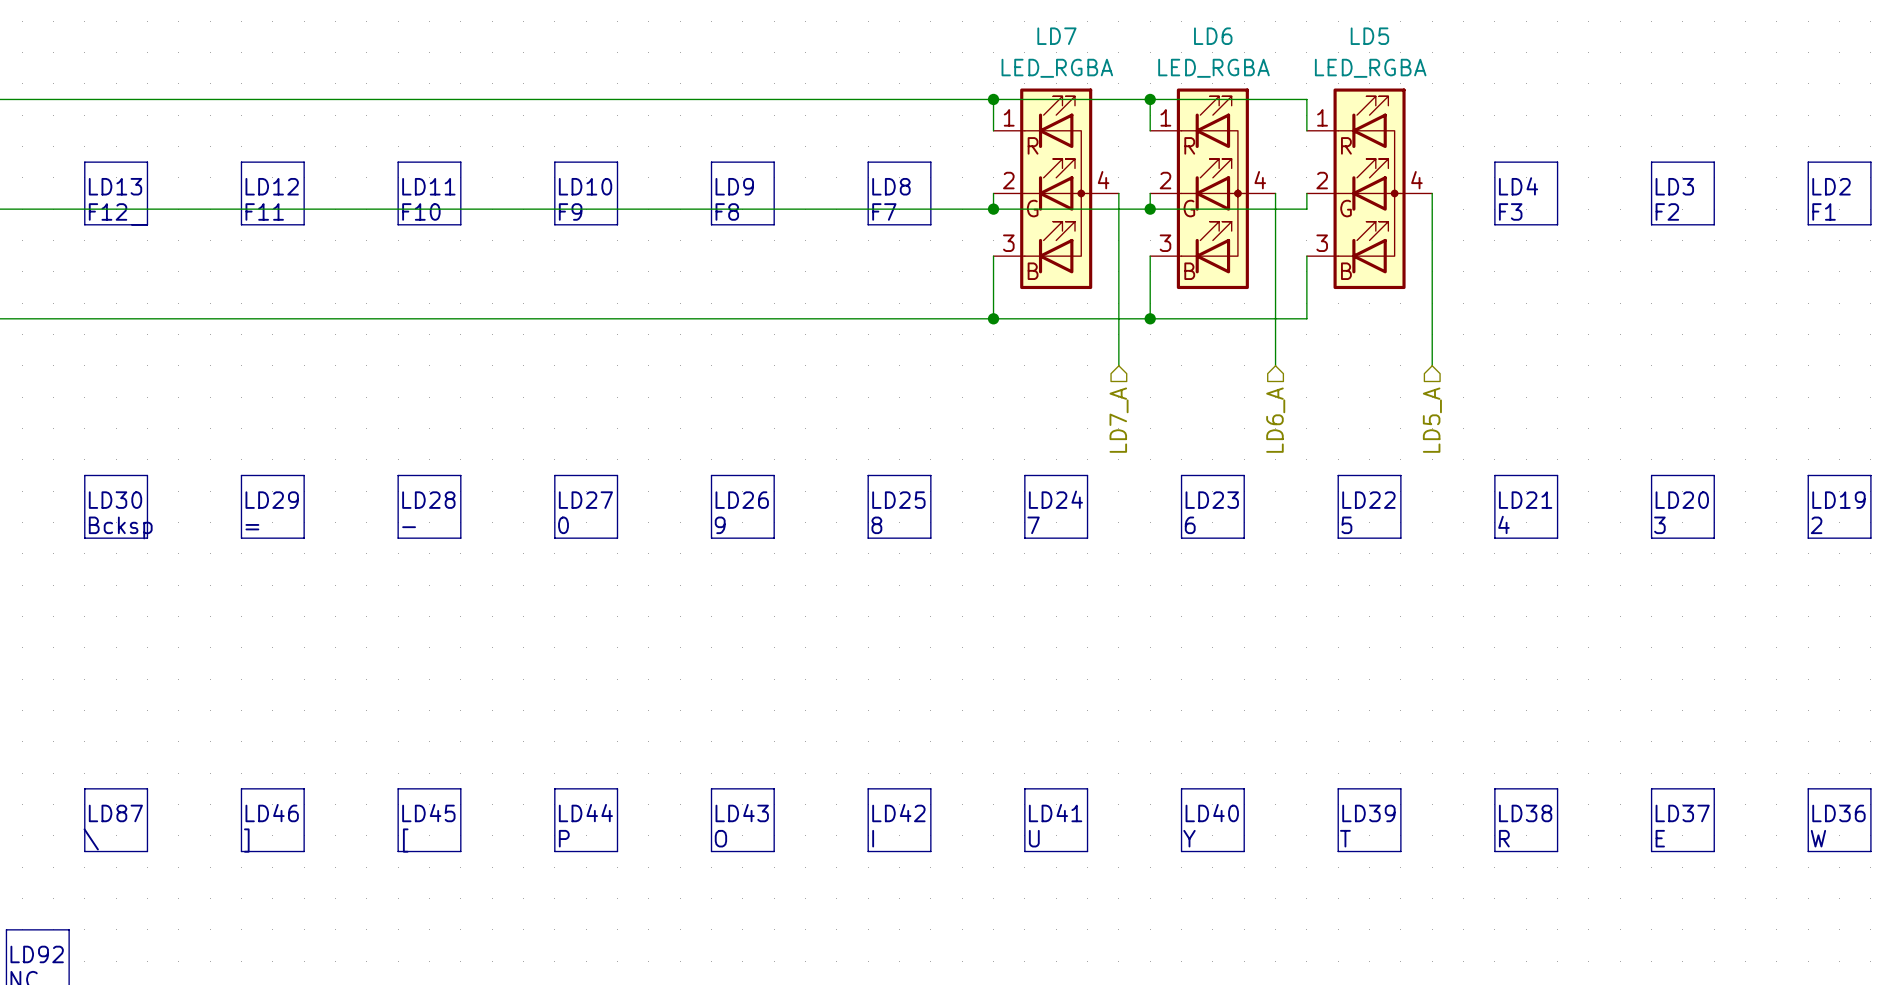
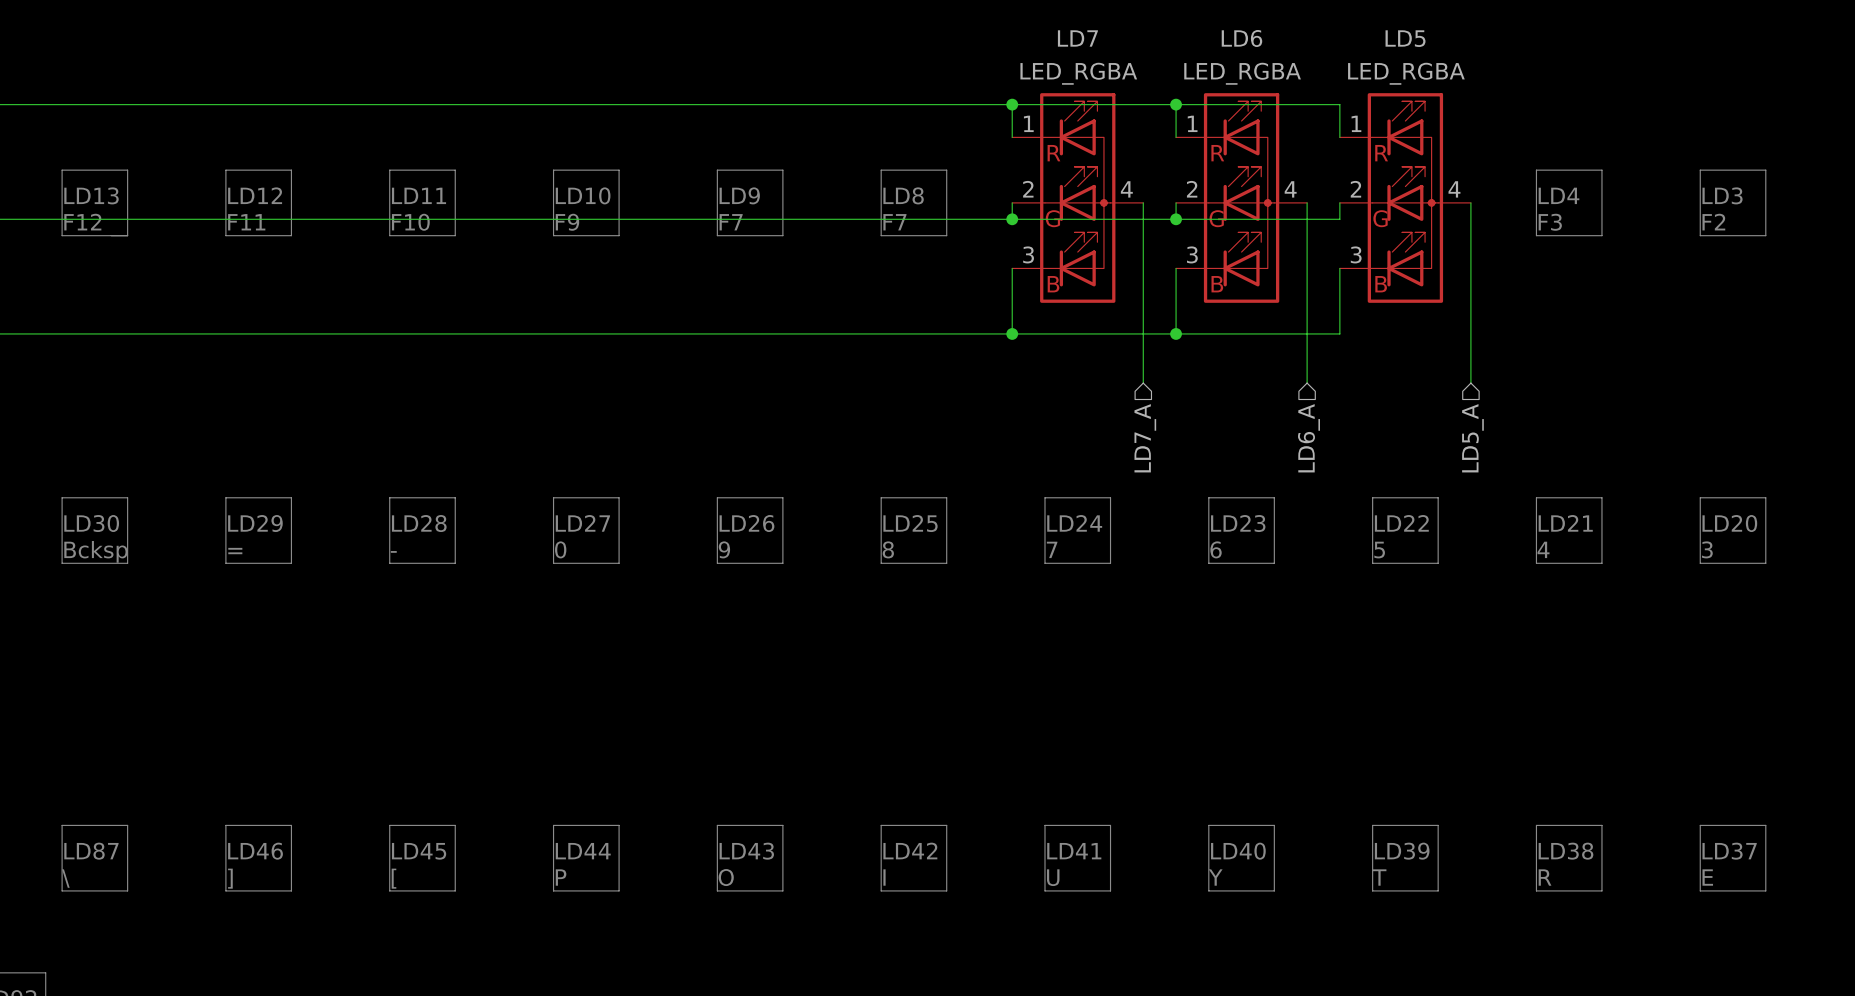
text: F8 (727, 211) -> F7 (731, 222)

